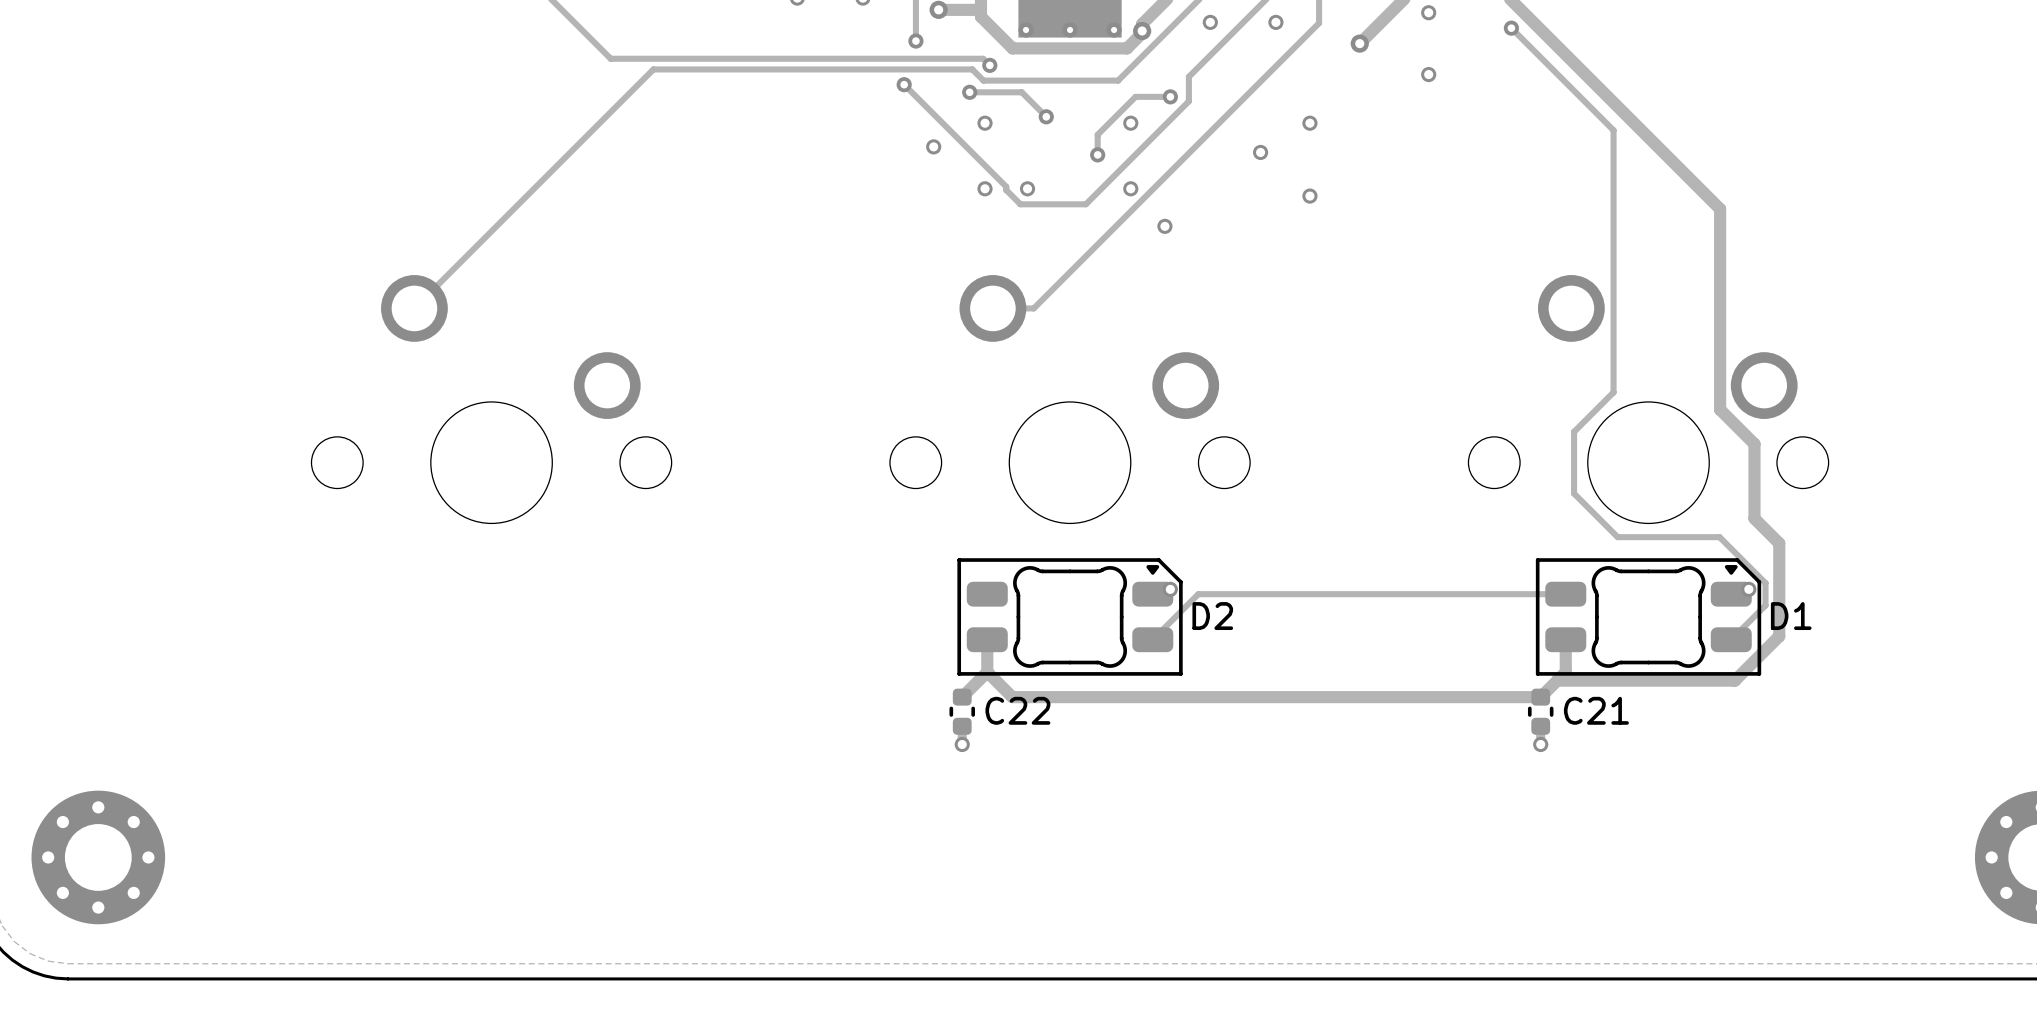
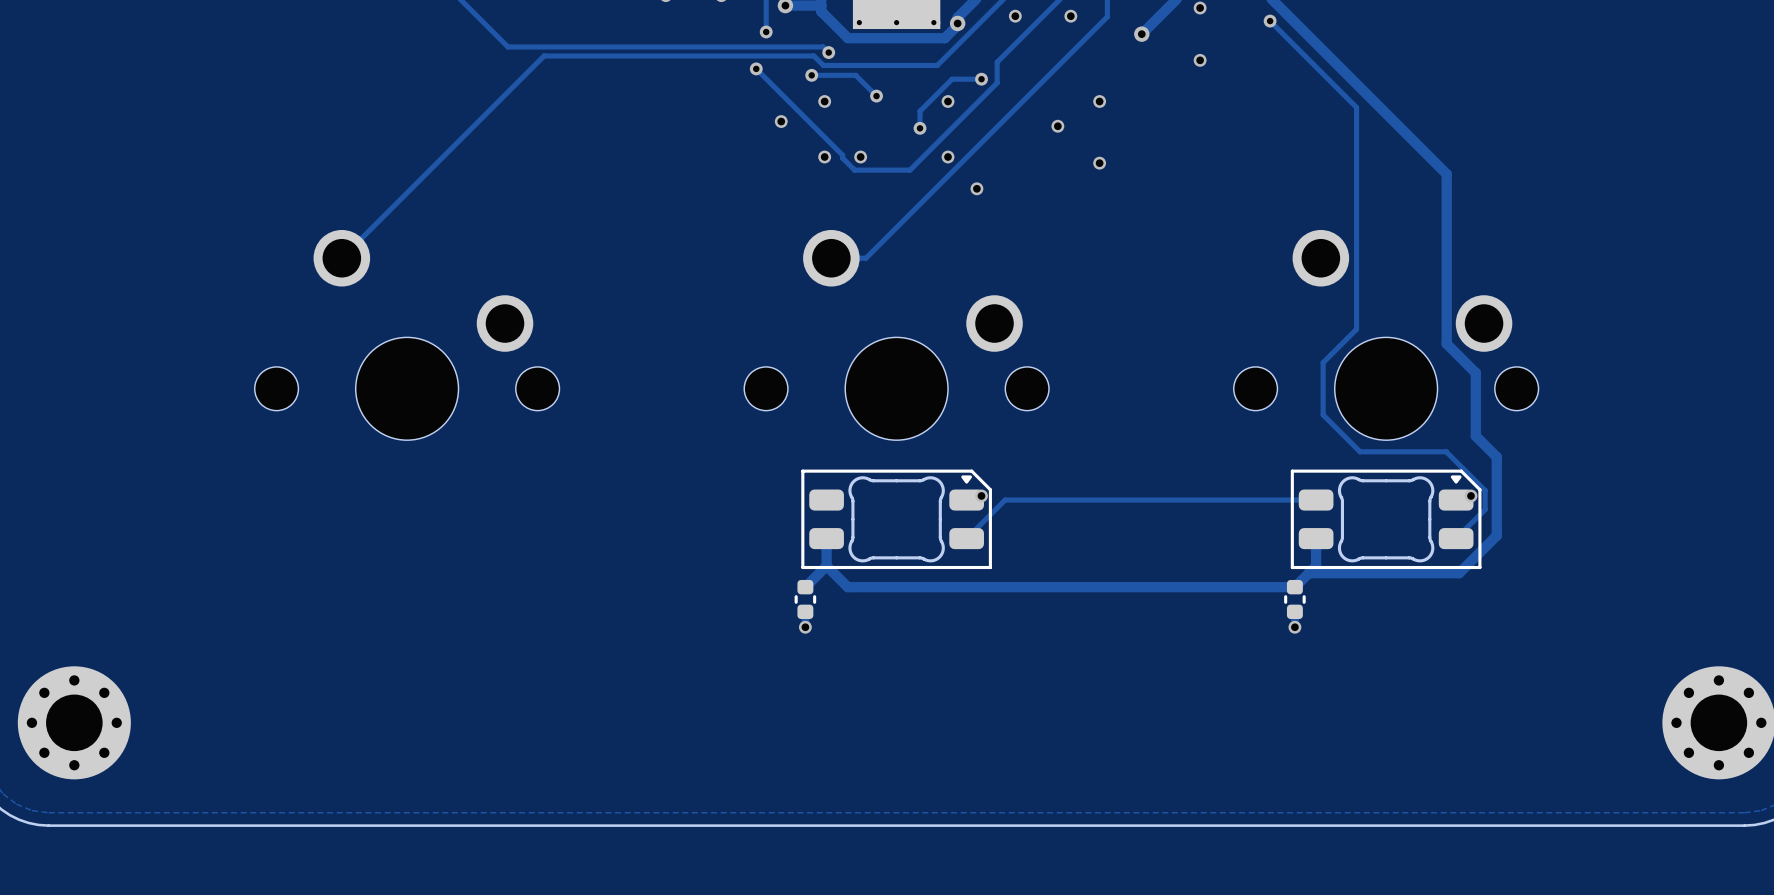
D2 name: D2 (1212, 616) -> none
D1 name: D1 (1791, 616) -> none
C22 name: C22 (1017, 710) -> none
C21 name: C21 (1596, 710) -> none

